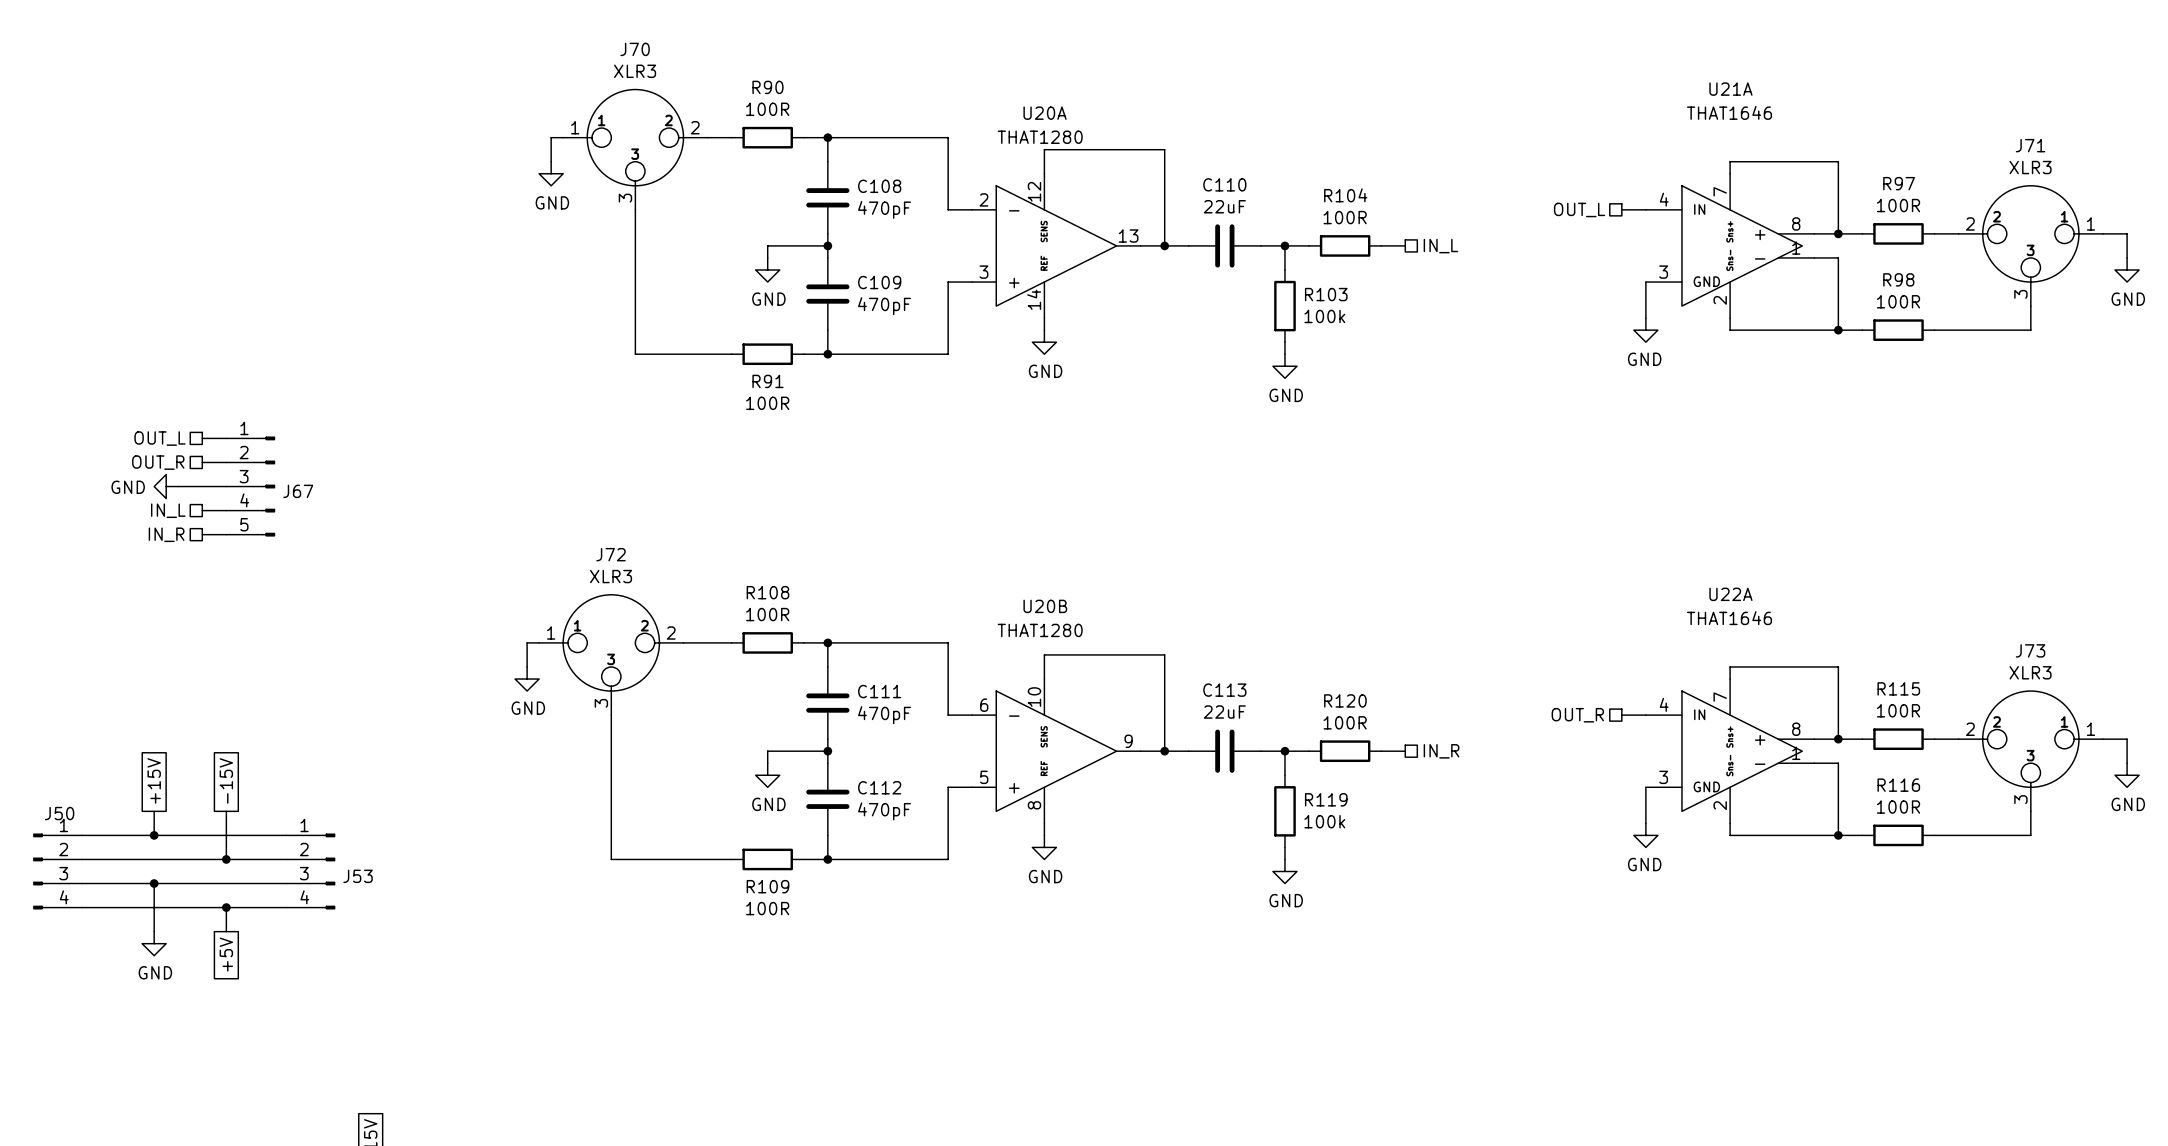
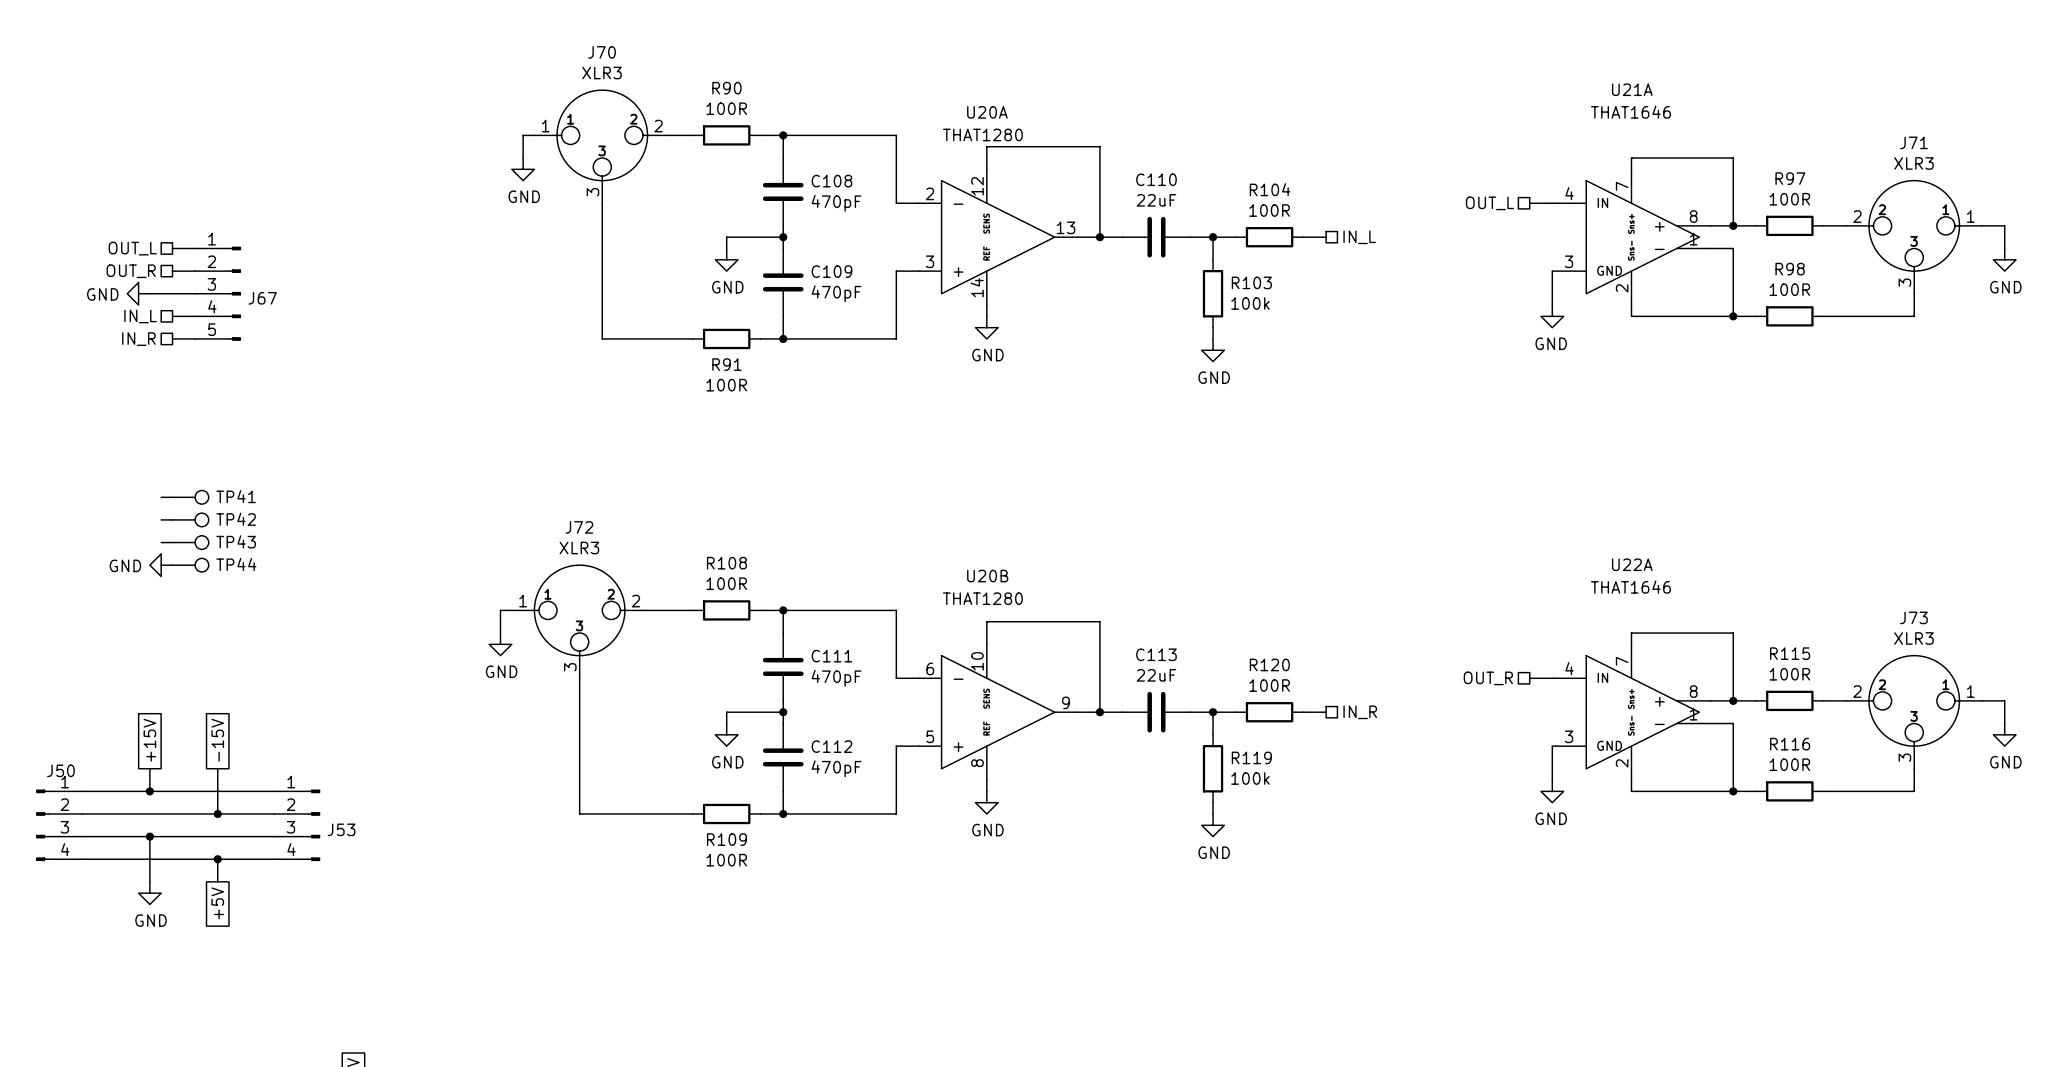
power symbol: none -> GND (138, 293)
hierarchical label position: OUT_L (160, 438) -> OUT_L (132, 248)
wire: (202, 438) (226, 438) -> (172, 248) (195, 248)
hierarchical label position: OUT_R (158, 462) -> OUT_R (131, 271)
wire: (202, 462) (226, 462) -> (172, 271) (195, 271)
power symbol: GND (166, 486) -> none
wire: (178, 486) (226, 486) -> (149, 293) (195, 293)
J67 position: (250, 486) -> (218, 293)
hierarchical label position: IN_L (168, 510) -> IN_L (140, 316)
wire: (202, 510) (226, 510) -> (172, 316) (195, 316)
wire: none -> (161, 497) (172, 497)
TP41: none -> (190, 497)
hierarchical label position: IN_R (166, 534) -> IN_R (138, 339)
wire: (202, 534) (226, 534) -> (172, 338) (195, 338)
wire: none -> (161, 519) (172, 519)
TP42: none -> (190, 519)
wire: none -> (161, 542) (172, 542)
TP43: none -> (190, 542)
power symbol: none -> GND (161, 565)
TP44: none -> (190, 565)

